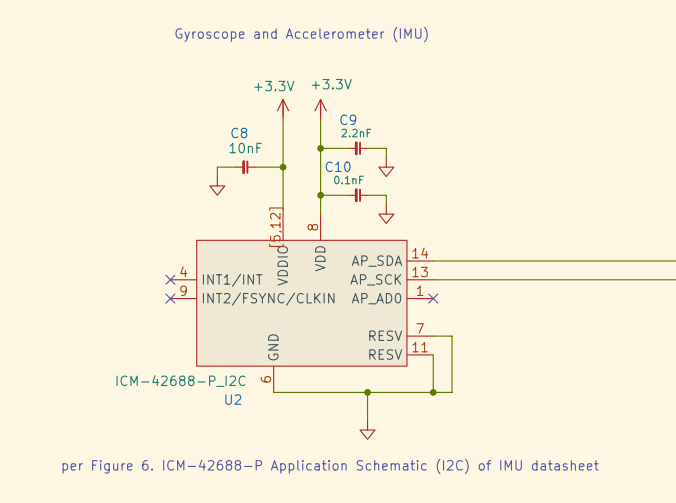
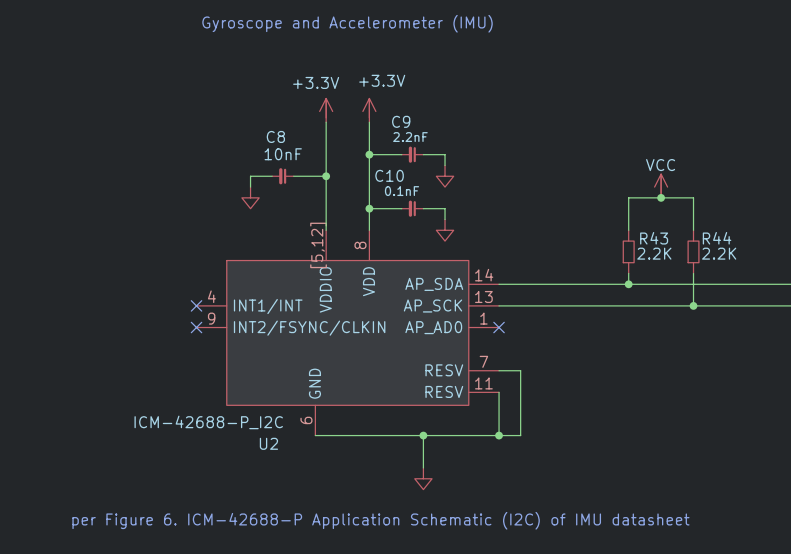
power symbol: none -> VCC (661, 185)
junction: none -> (661, 197)
wire: none -> (628, 230) (628, 197) (693, 197) (693, 230)
R43: none -> 2.2K (628, 251)
R44: none -> 2.2K (693, 251)
wire: none -> (628, 273) (628, 284)
wire: none -> (693, 273) (693, 305)
junction: none -> (628, 284)
junction: none -> (693, 305)

